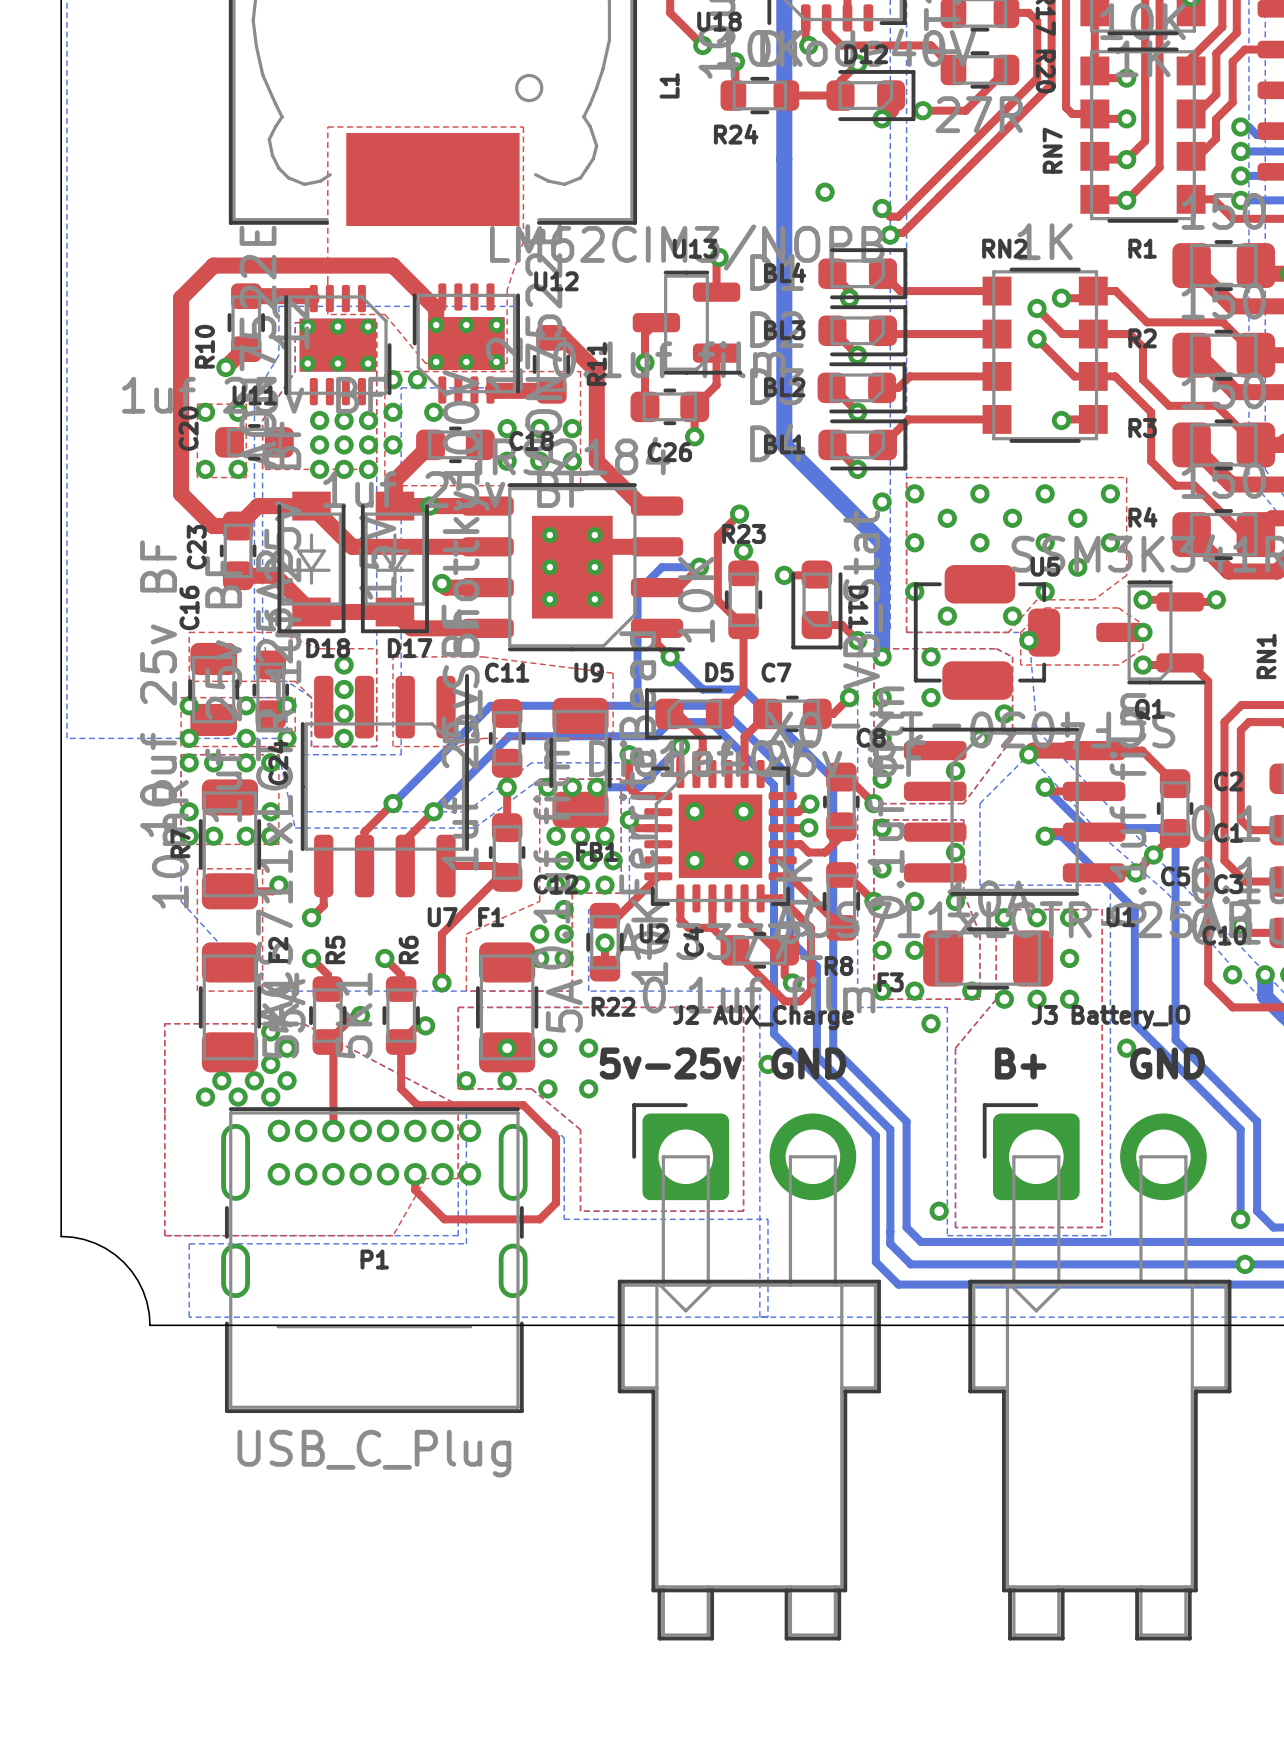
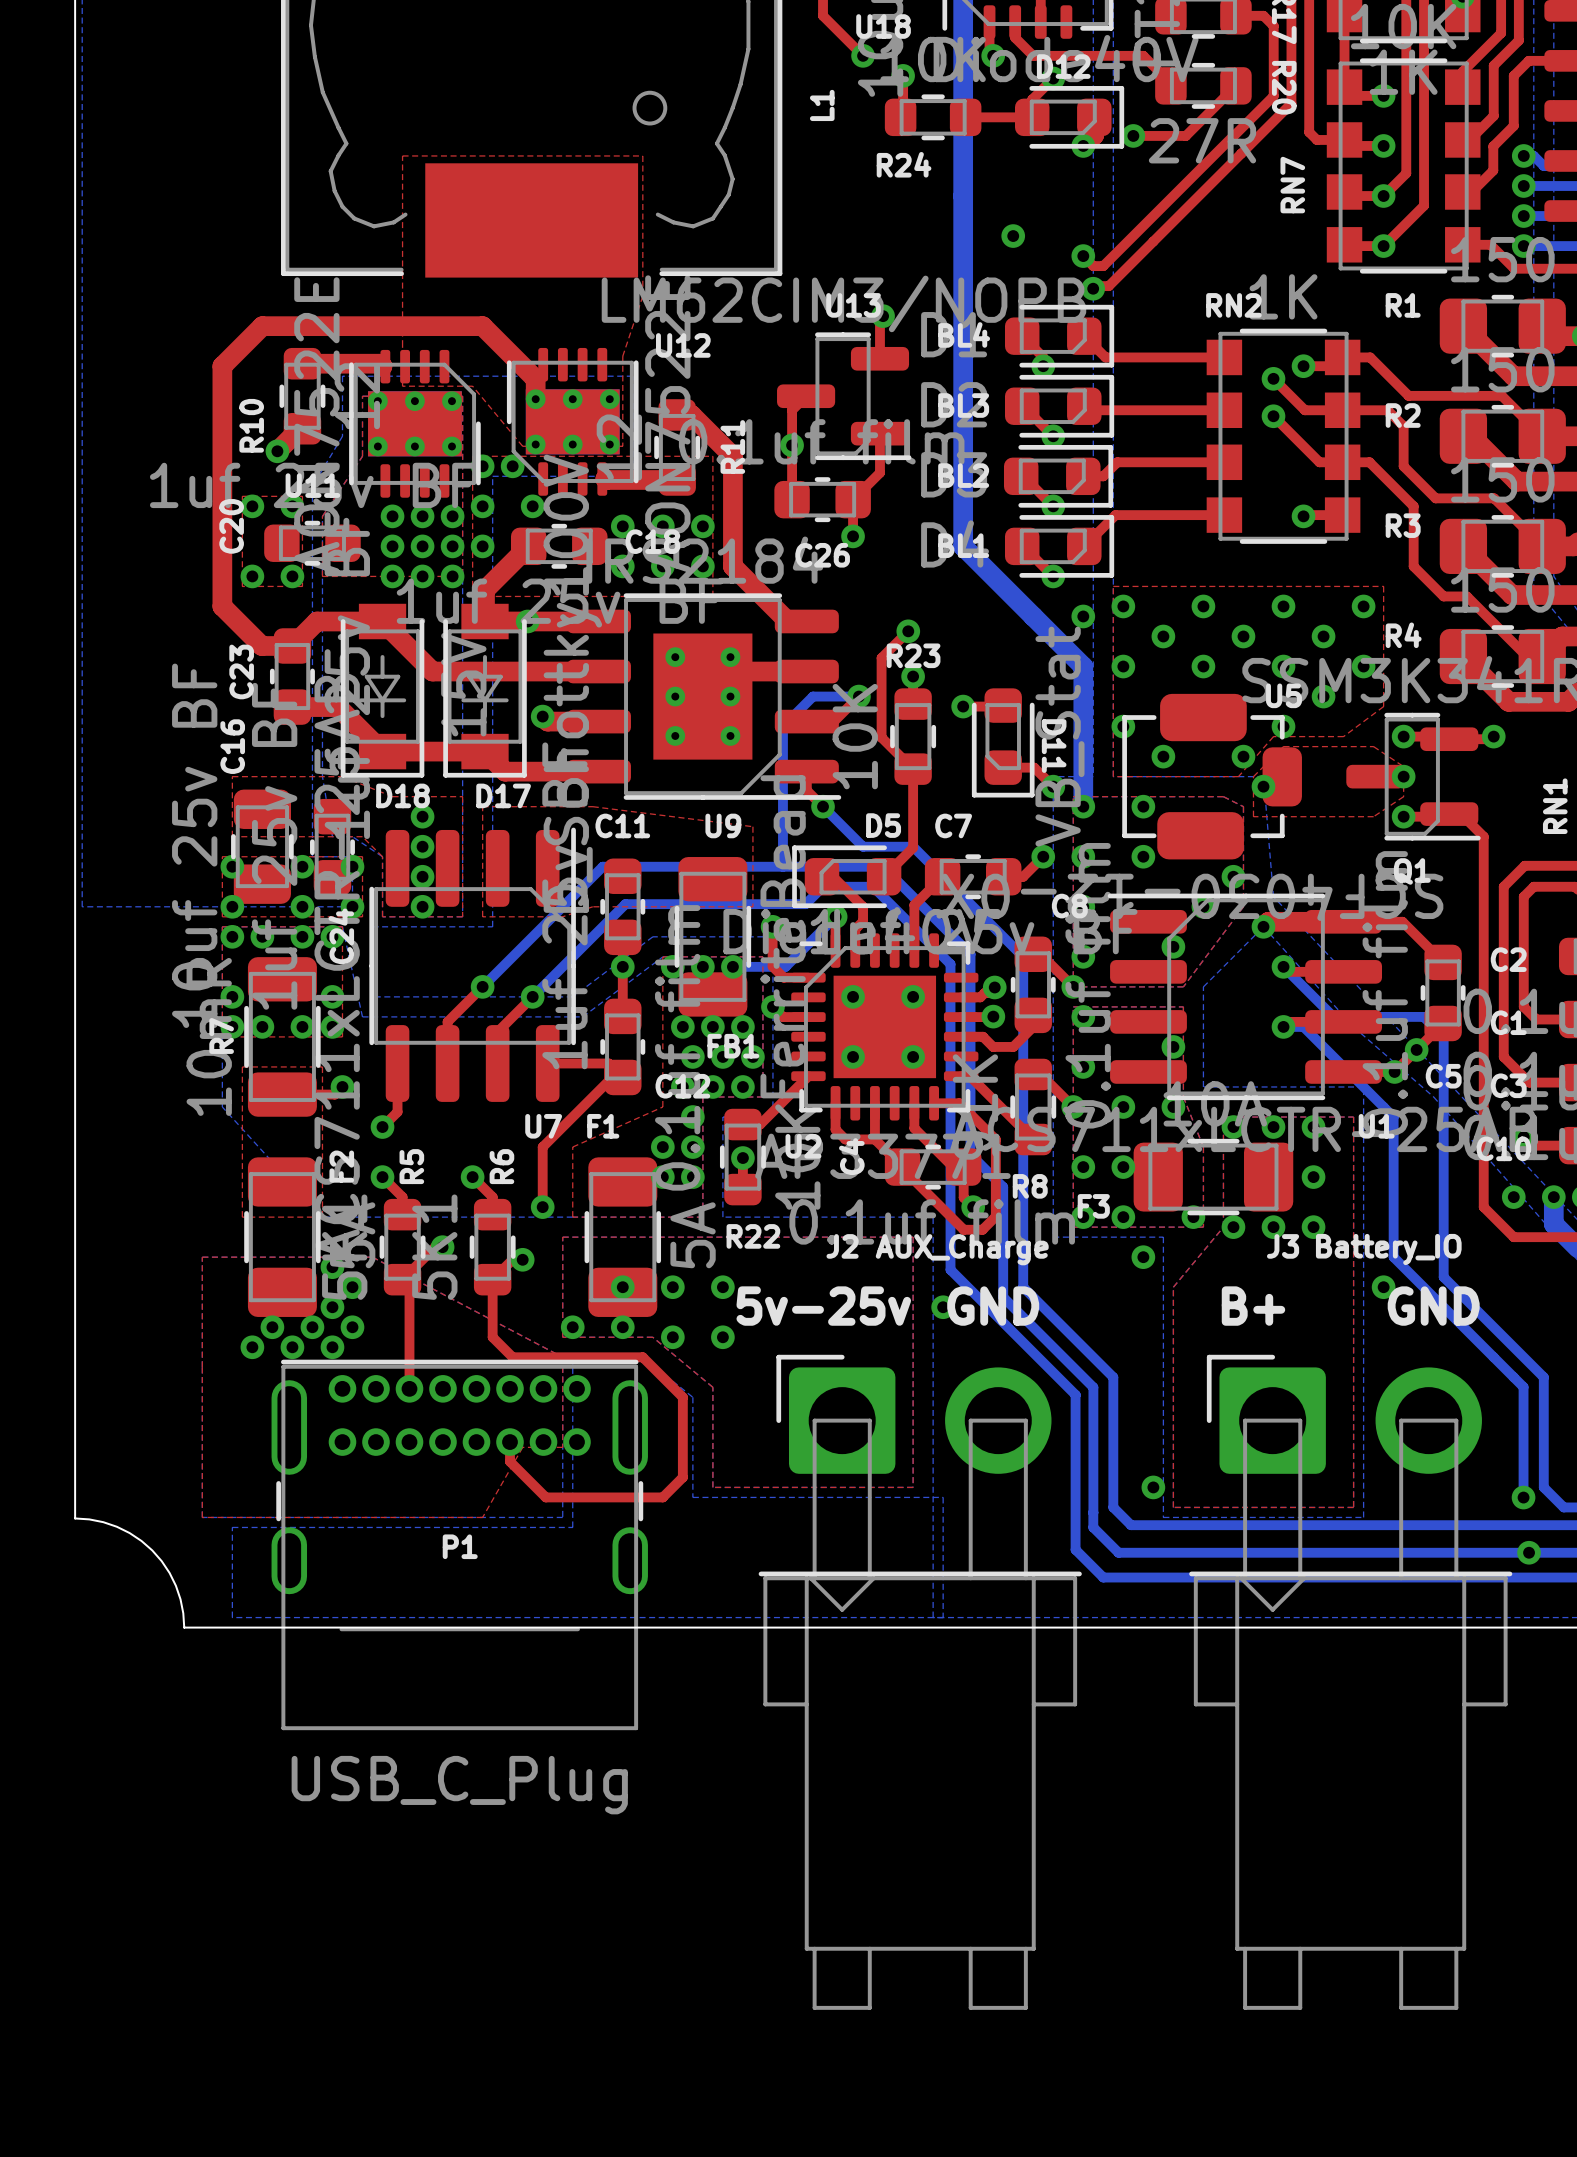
J2 footprint: [617, 1103, 881, 1641] -> [758, 1354, 1082, 2010]
J3 footprint: [968, 1103, 1232, 1641] -> [1189, 1354, 1513, 2010]
P1 footprint: [221, 1107, 528, 1414] -> [271, 1359, 648, 1731]

